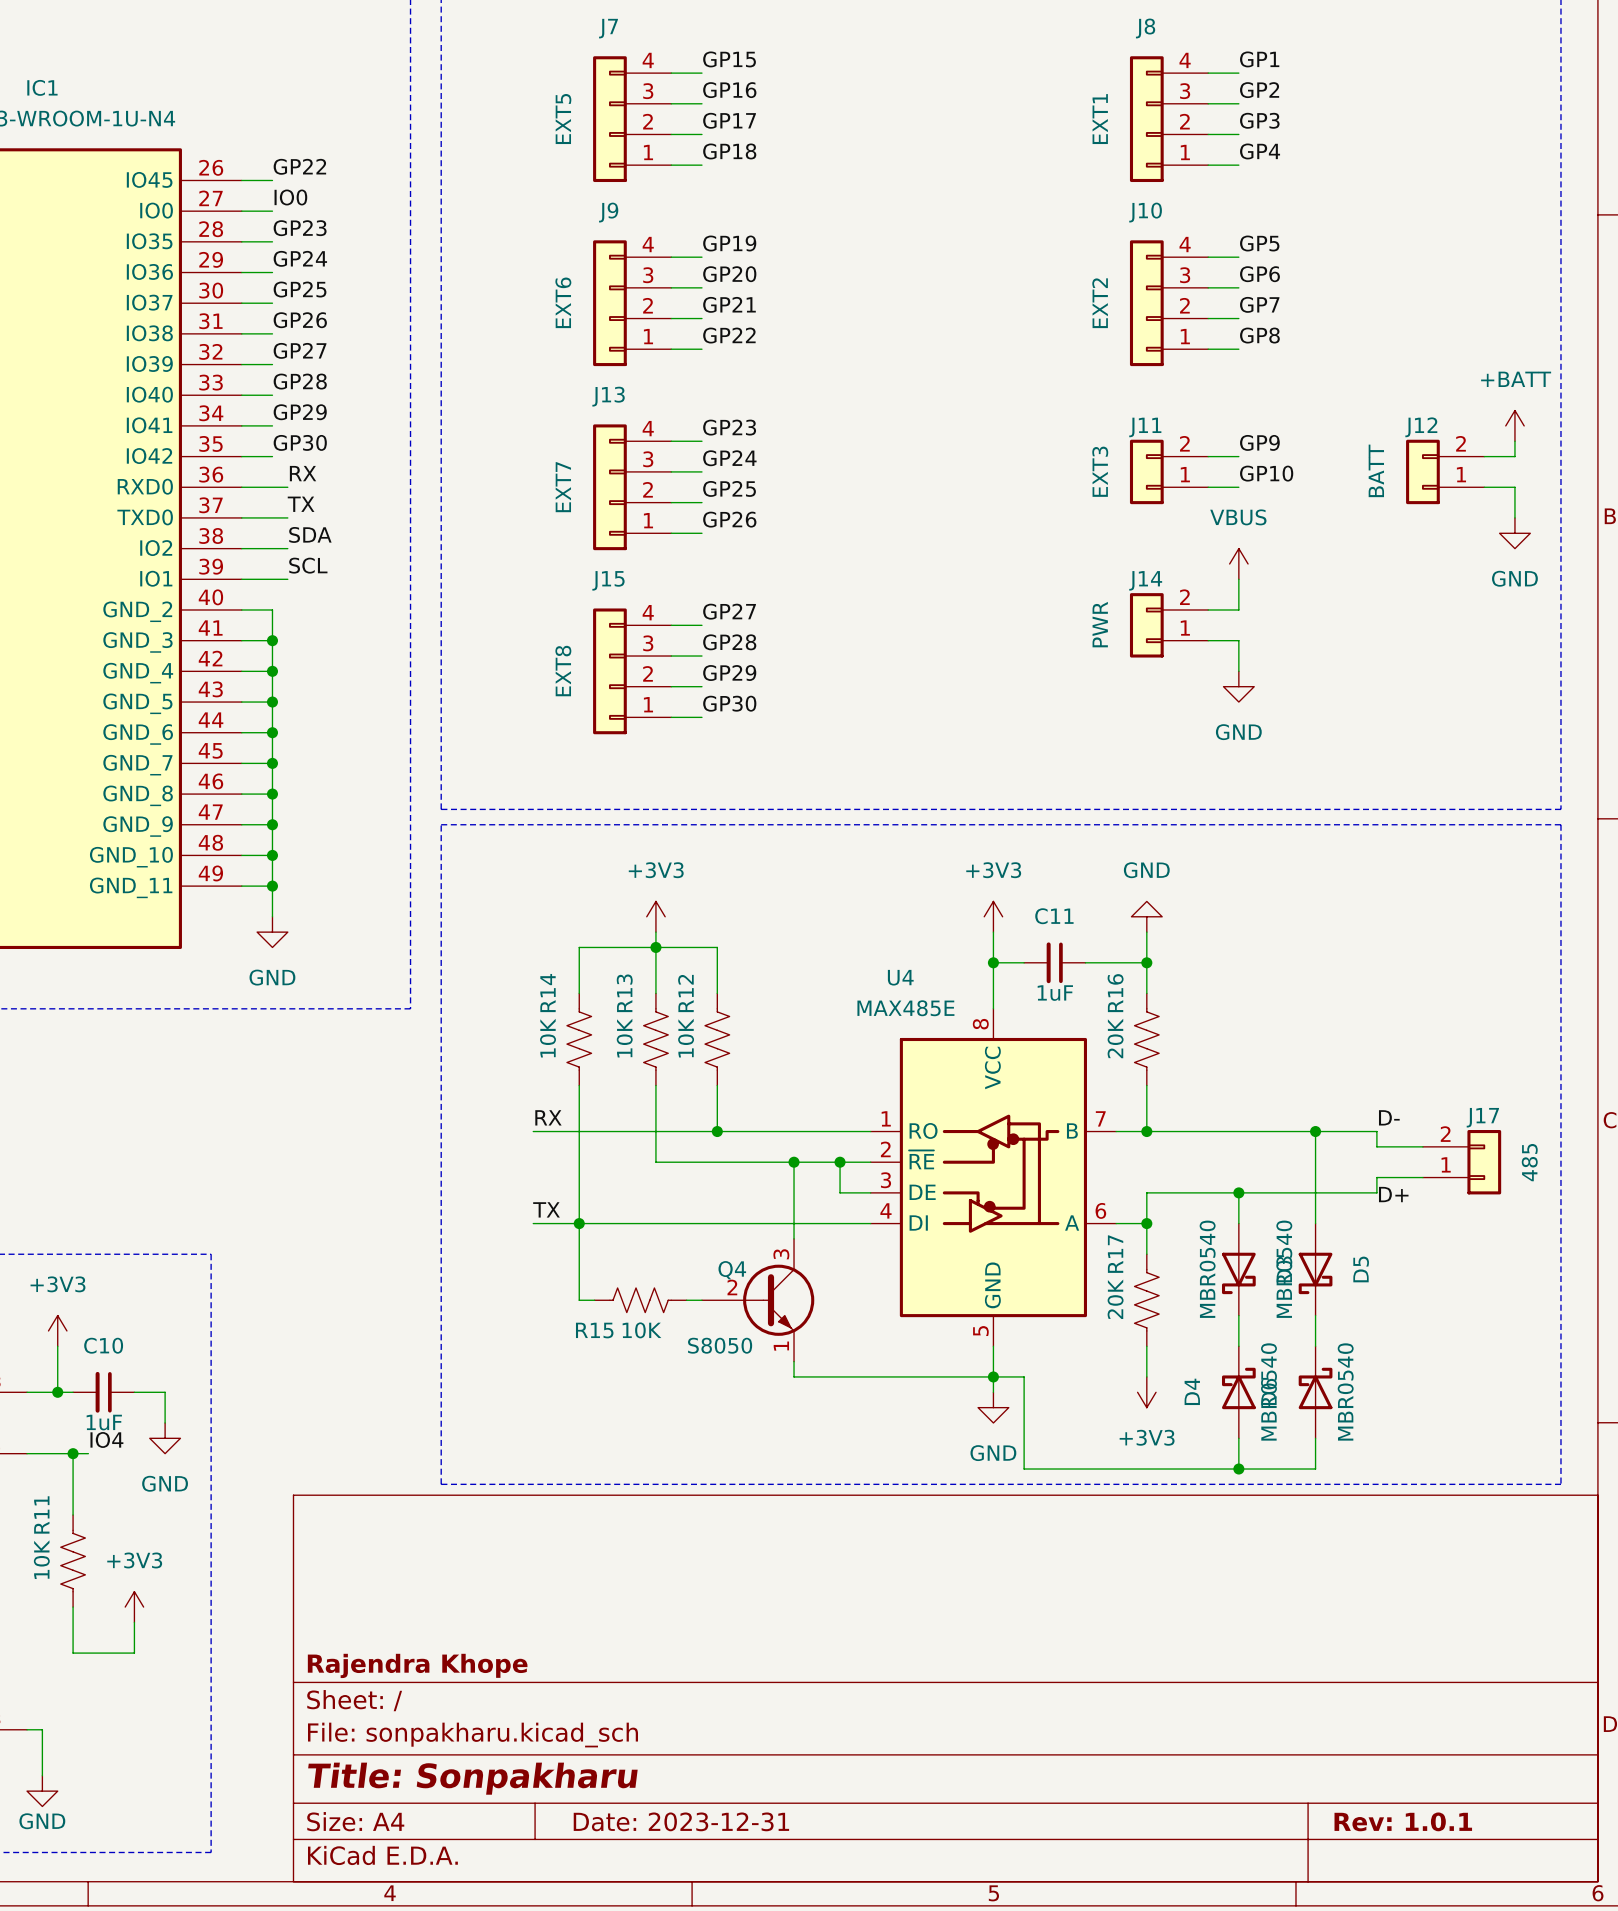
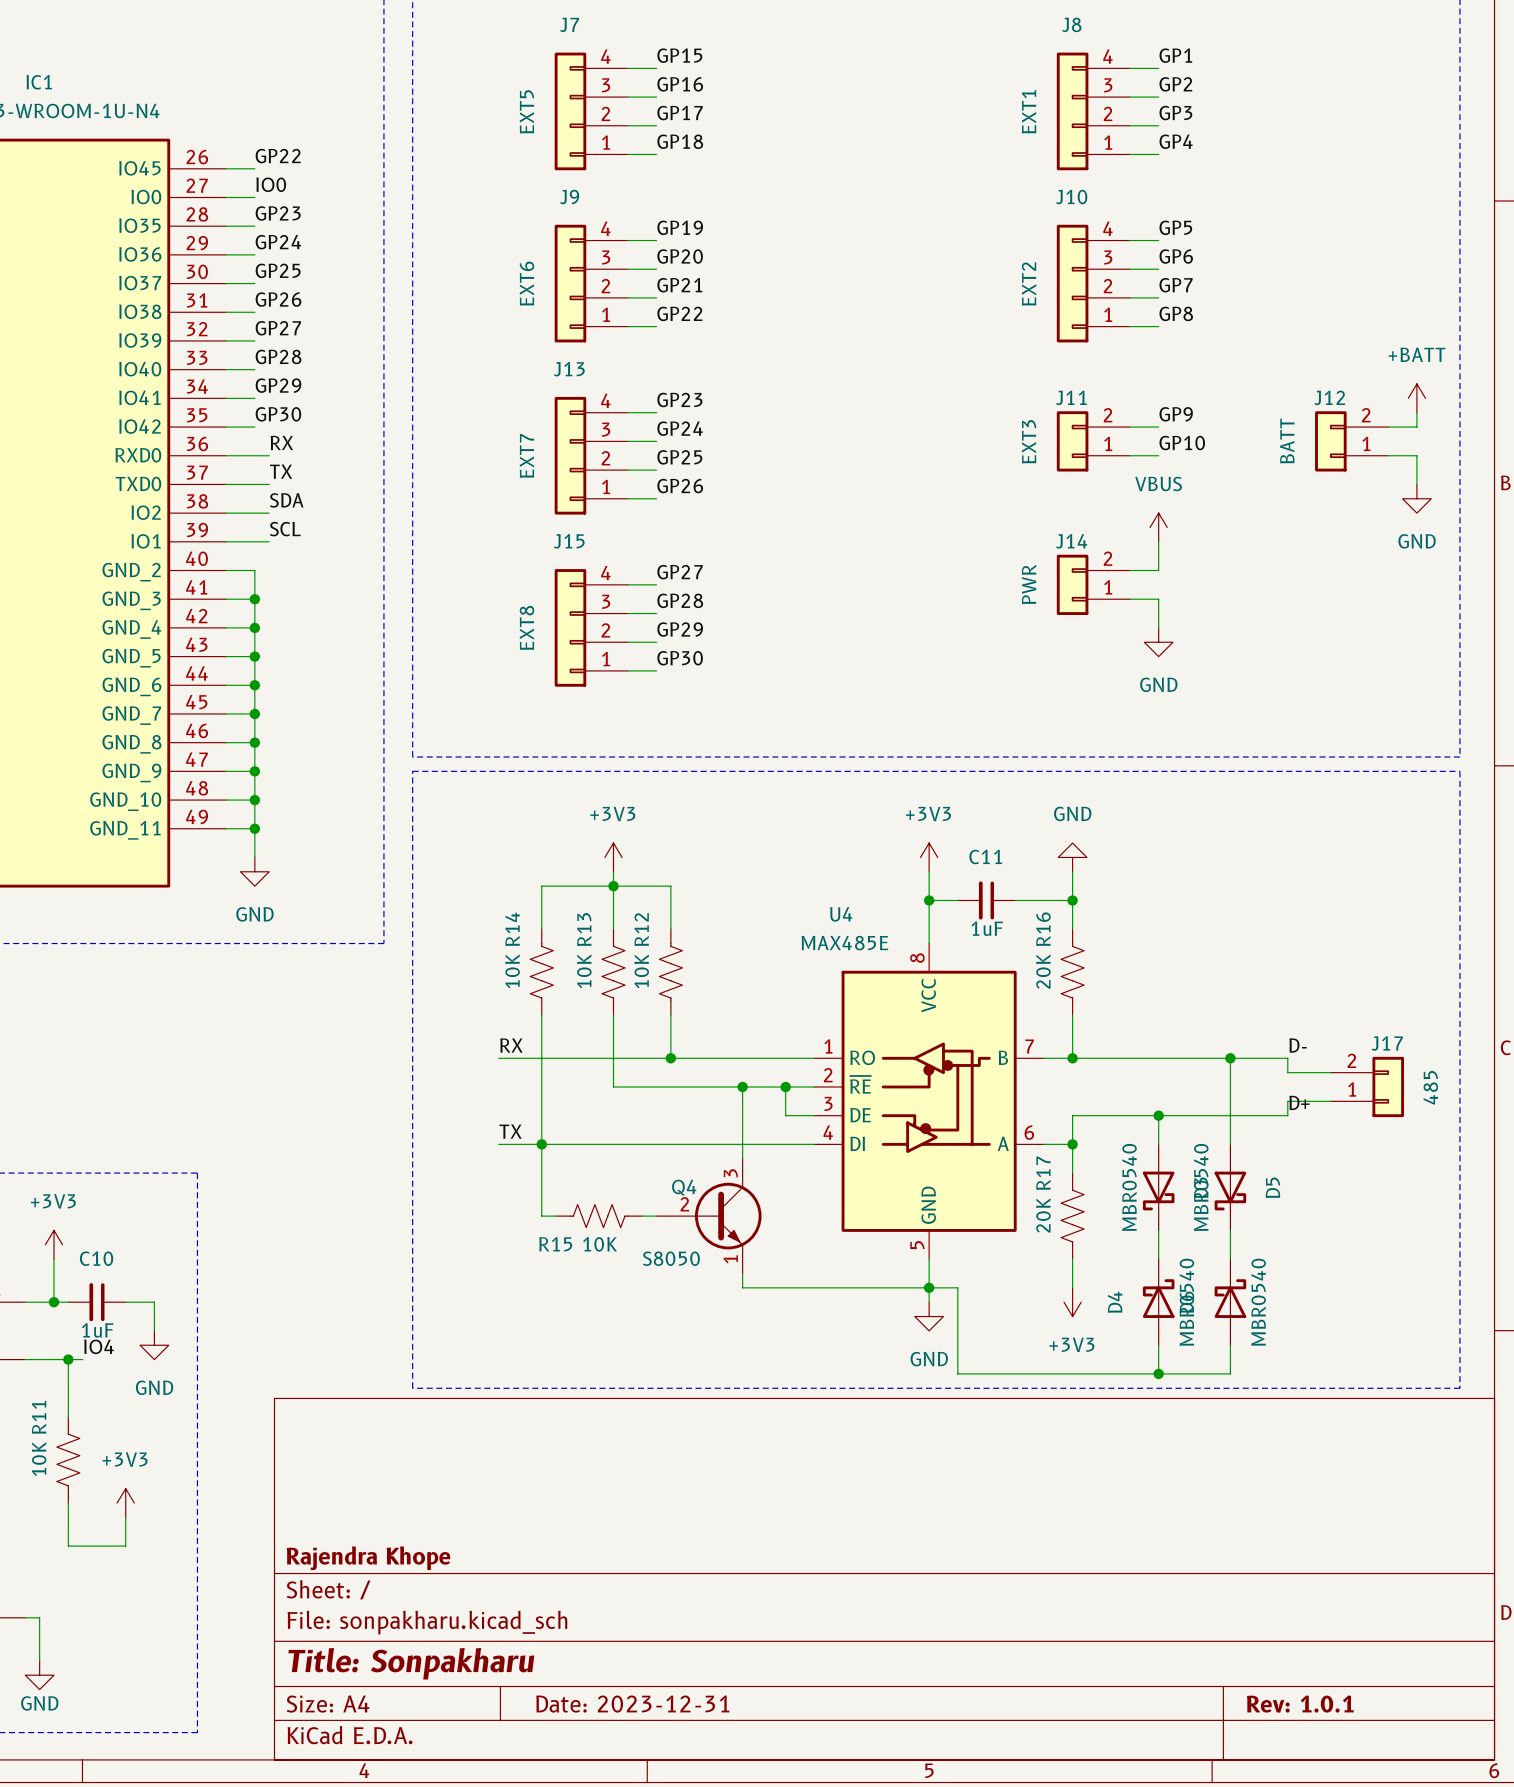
label position: D+ (1393, 1194) -> D+ (1299, 1102)

